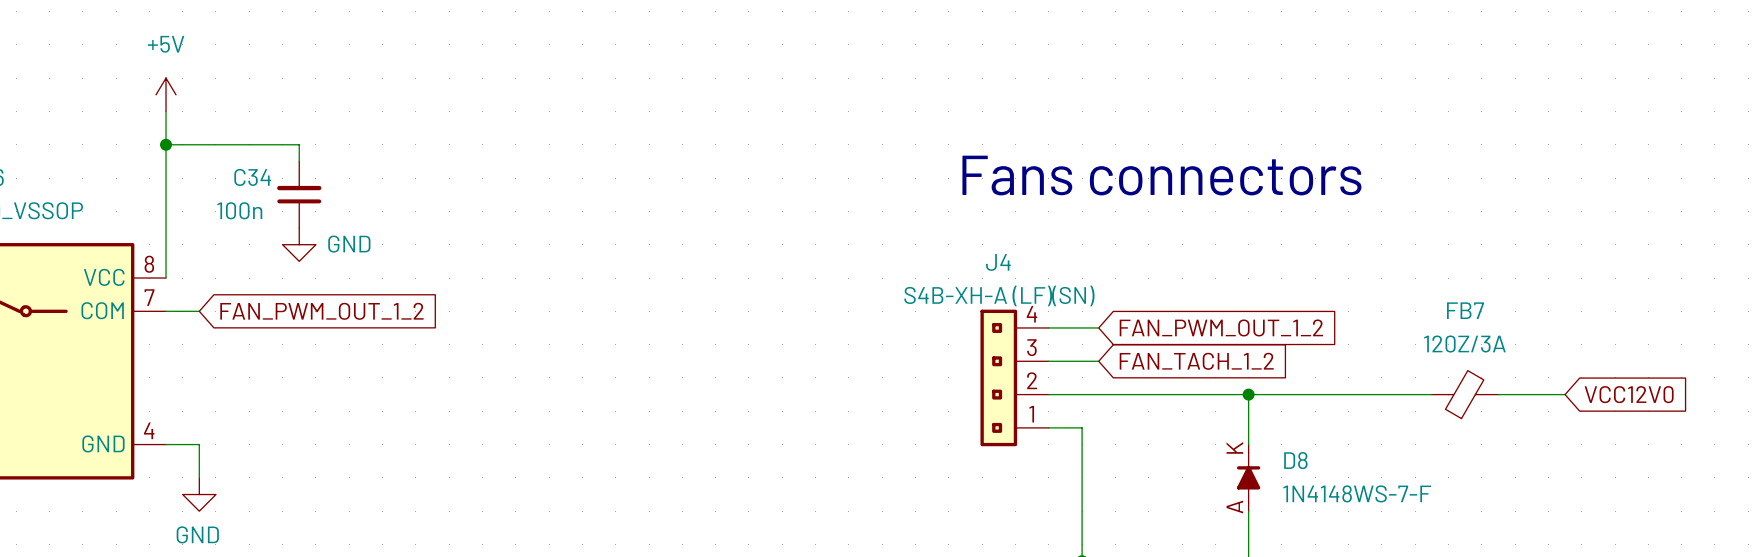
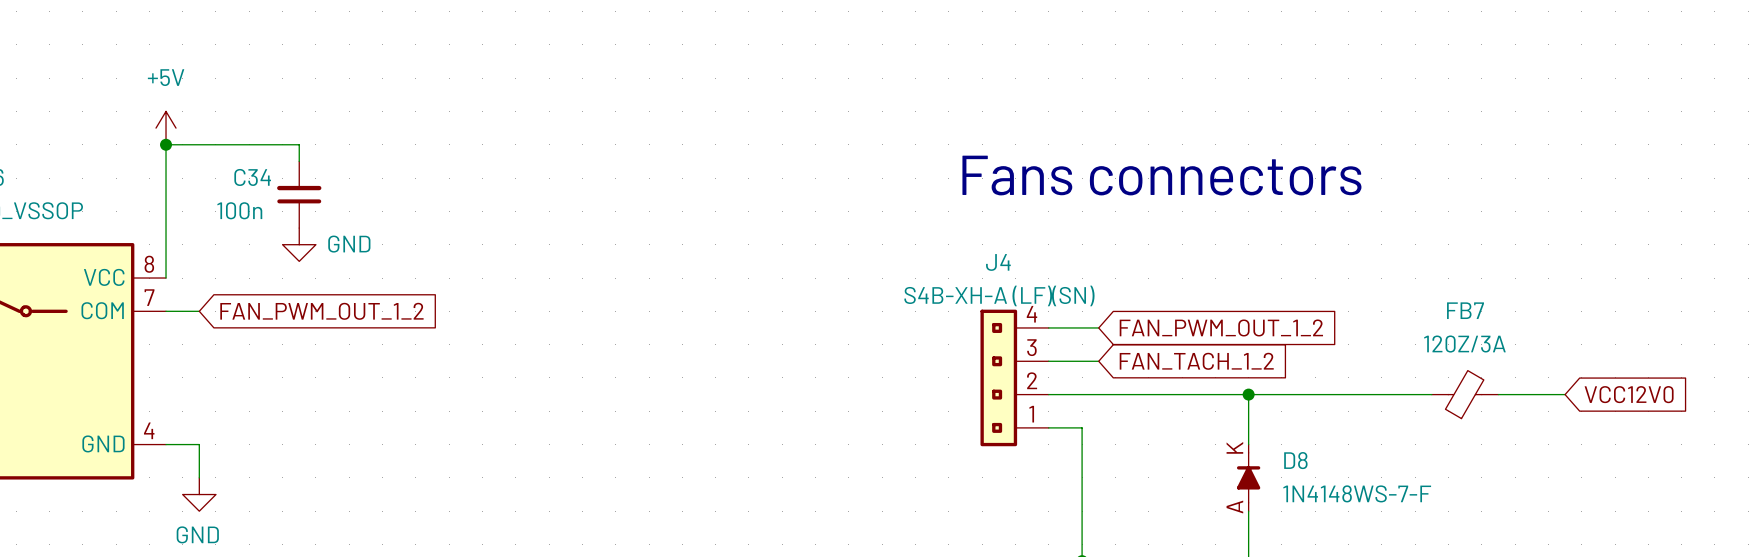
power symbol position: +5V (166, 94) -> +5V (166, 128)

